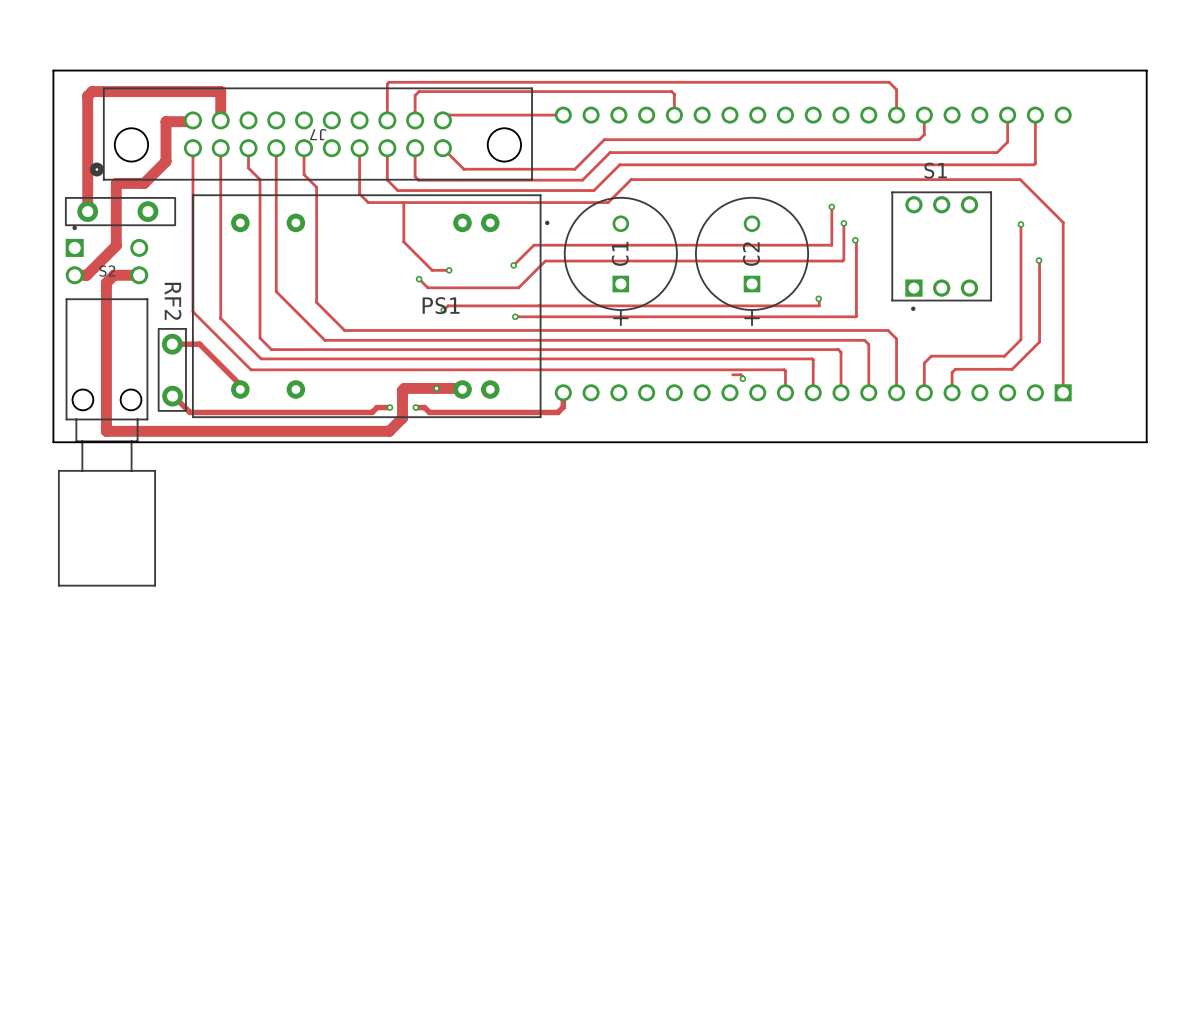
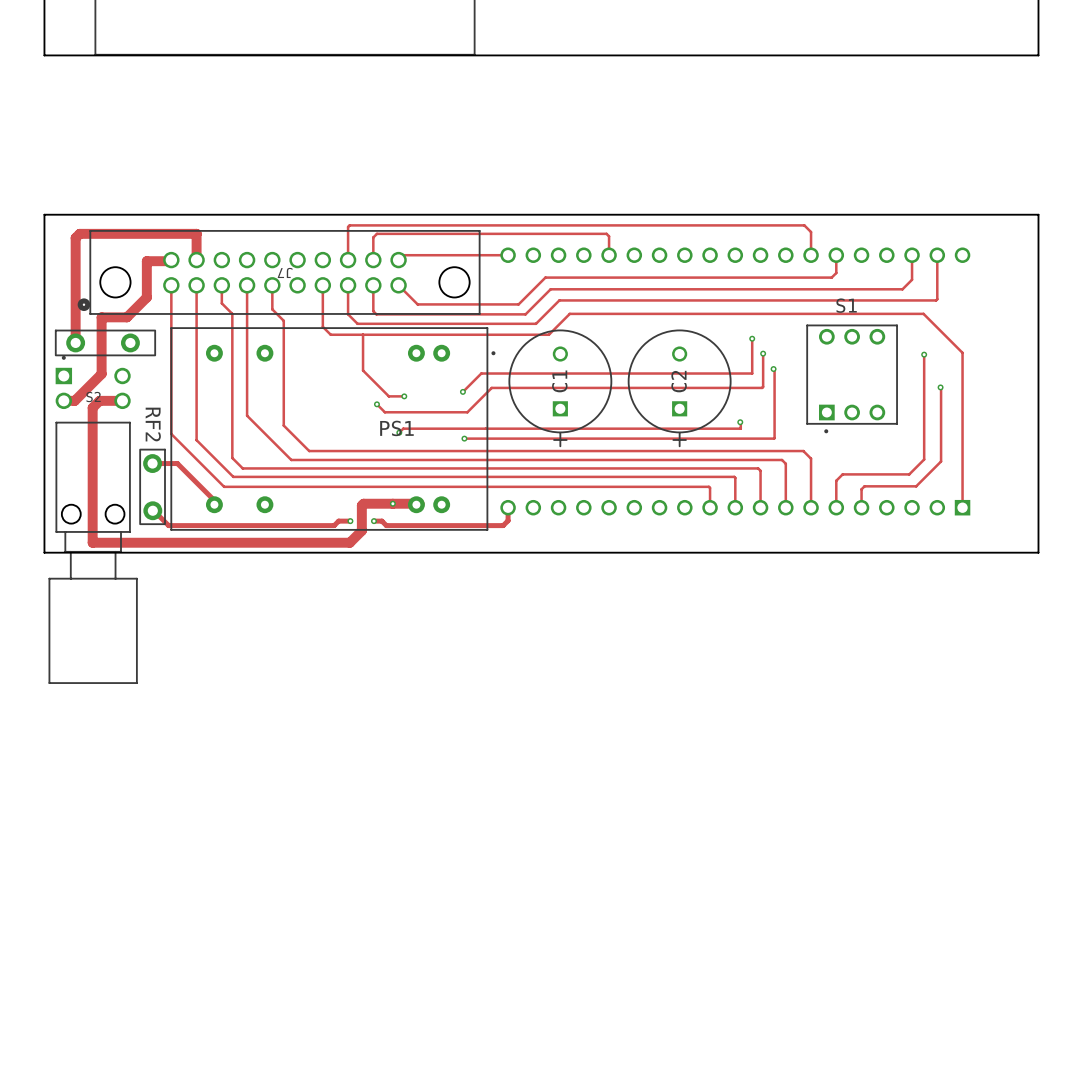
track: (732, 374) (740, 374) (742, 378) -> none
via: (742, 378) -> none

